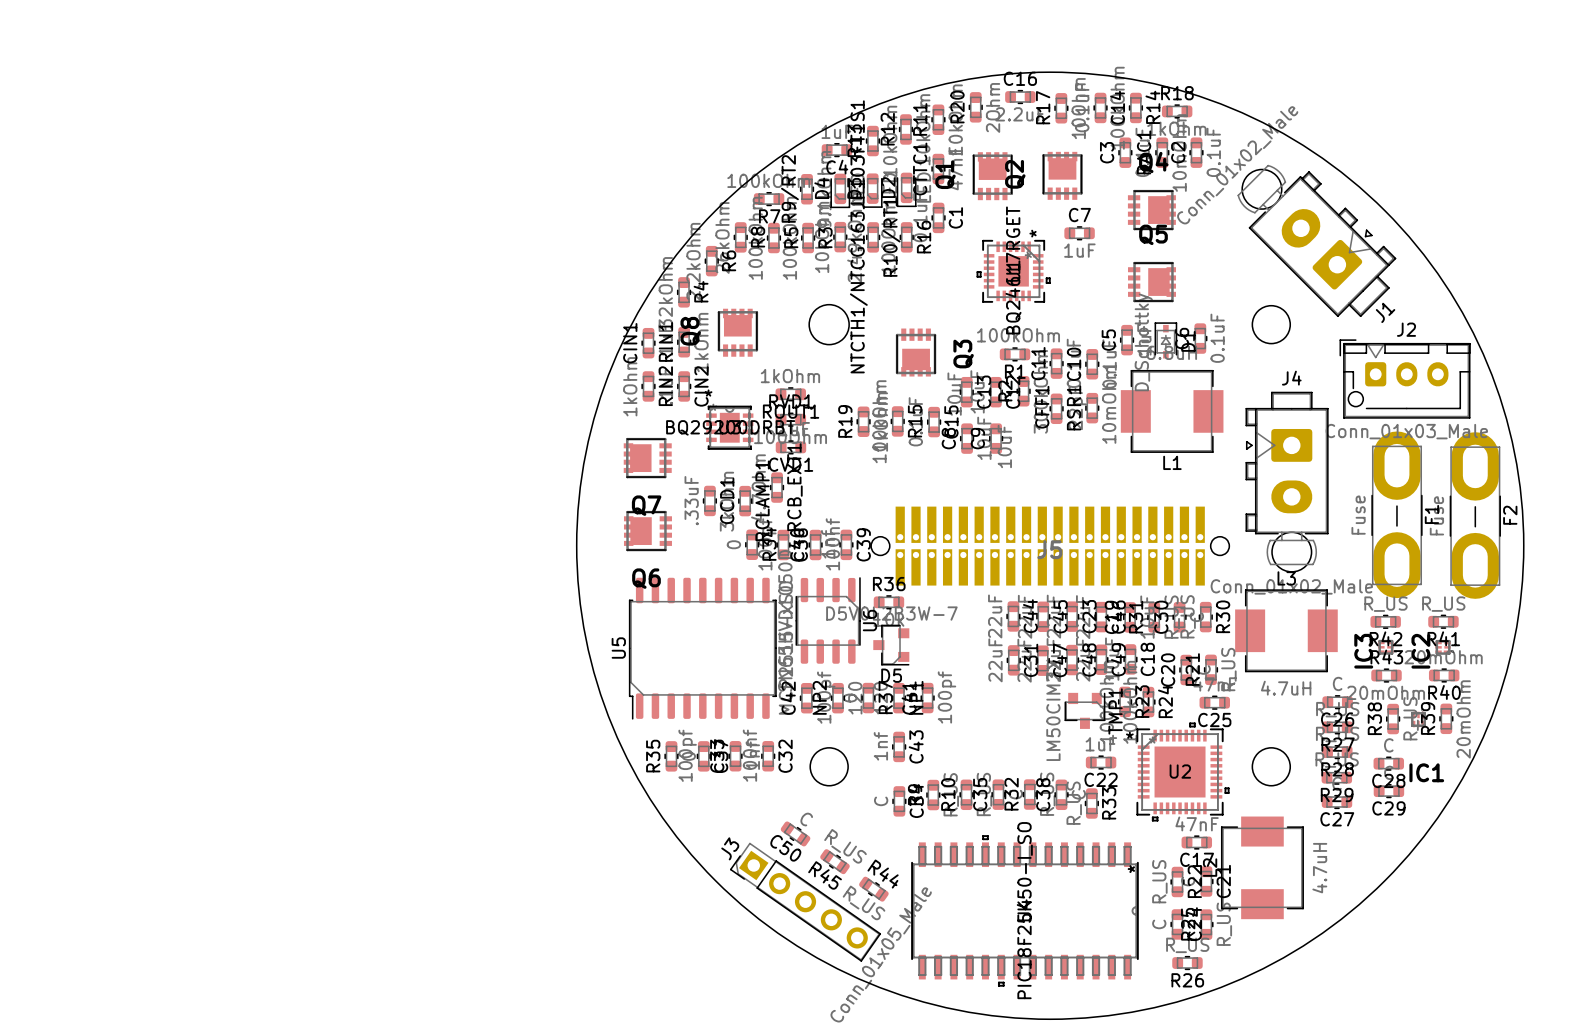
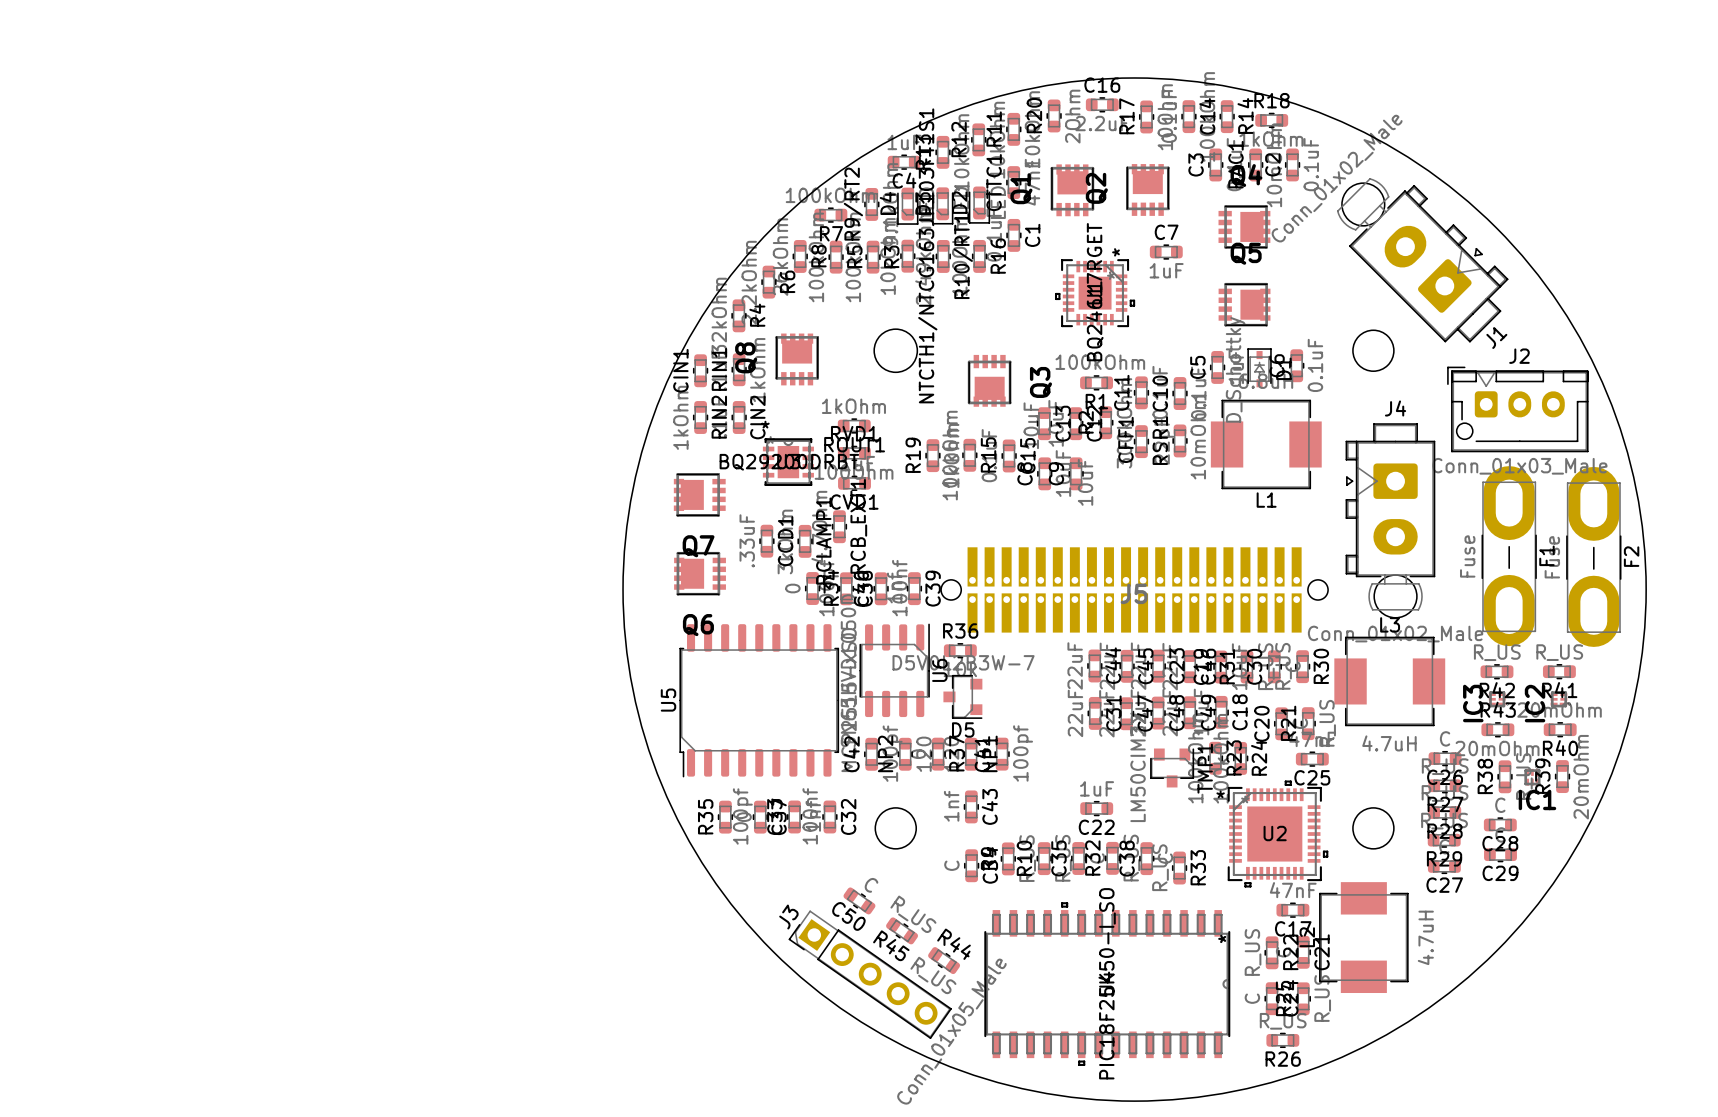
C22 position: (1101, 762) -> (1096, 808)
IC1 name position: IC1 (1426, 772) -> IC1 (1537, 799)

